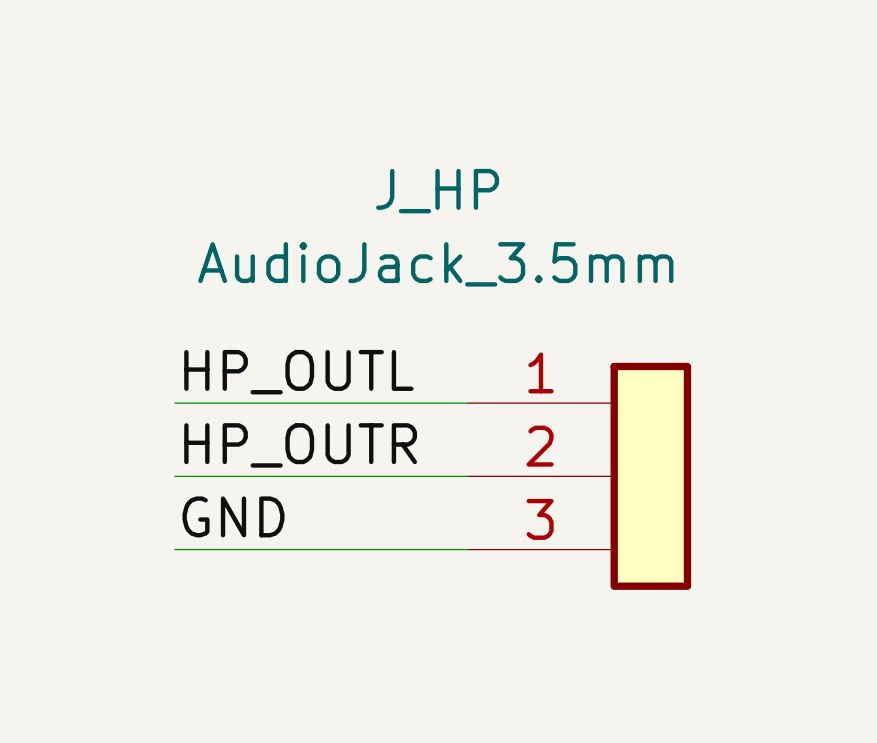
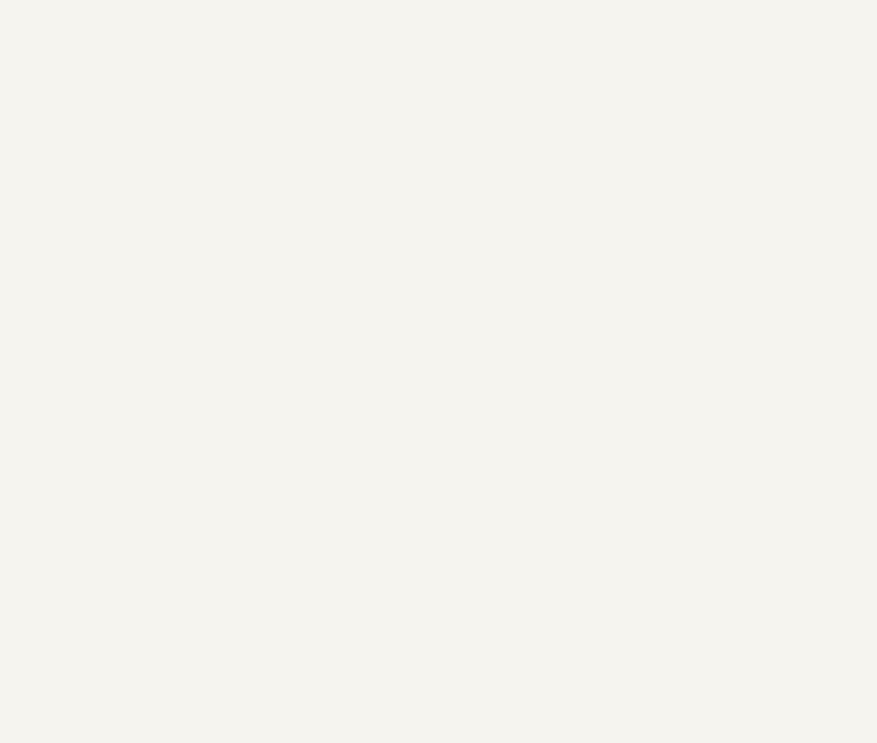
label: HP_OUTL (298, 372) -> none
wire: (174, 403) (467, 403) -> none
label: HP_OUTR (300, 445) -> none
wire: (174, 476) (467, 476) -> none
J_HP: AudioJack_3.5mm (579, 476) -> none
label: GND (233, 516) -> none
wire: (174, 549) (467, 549) -> none

